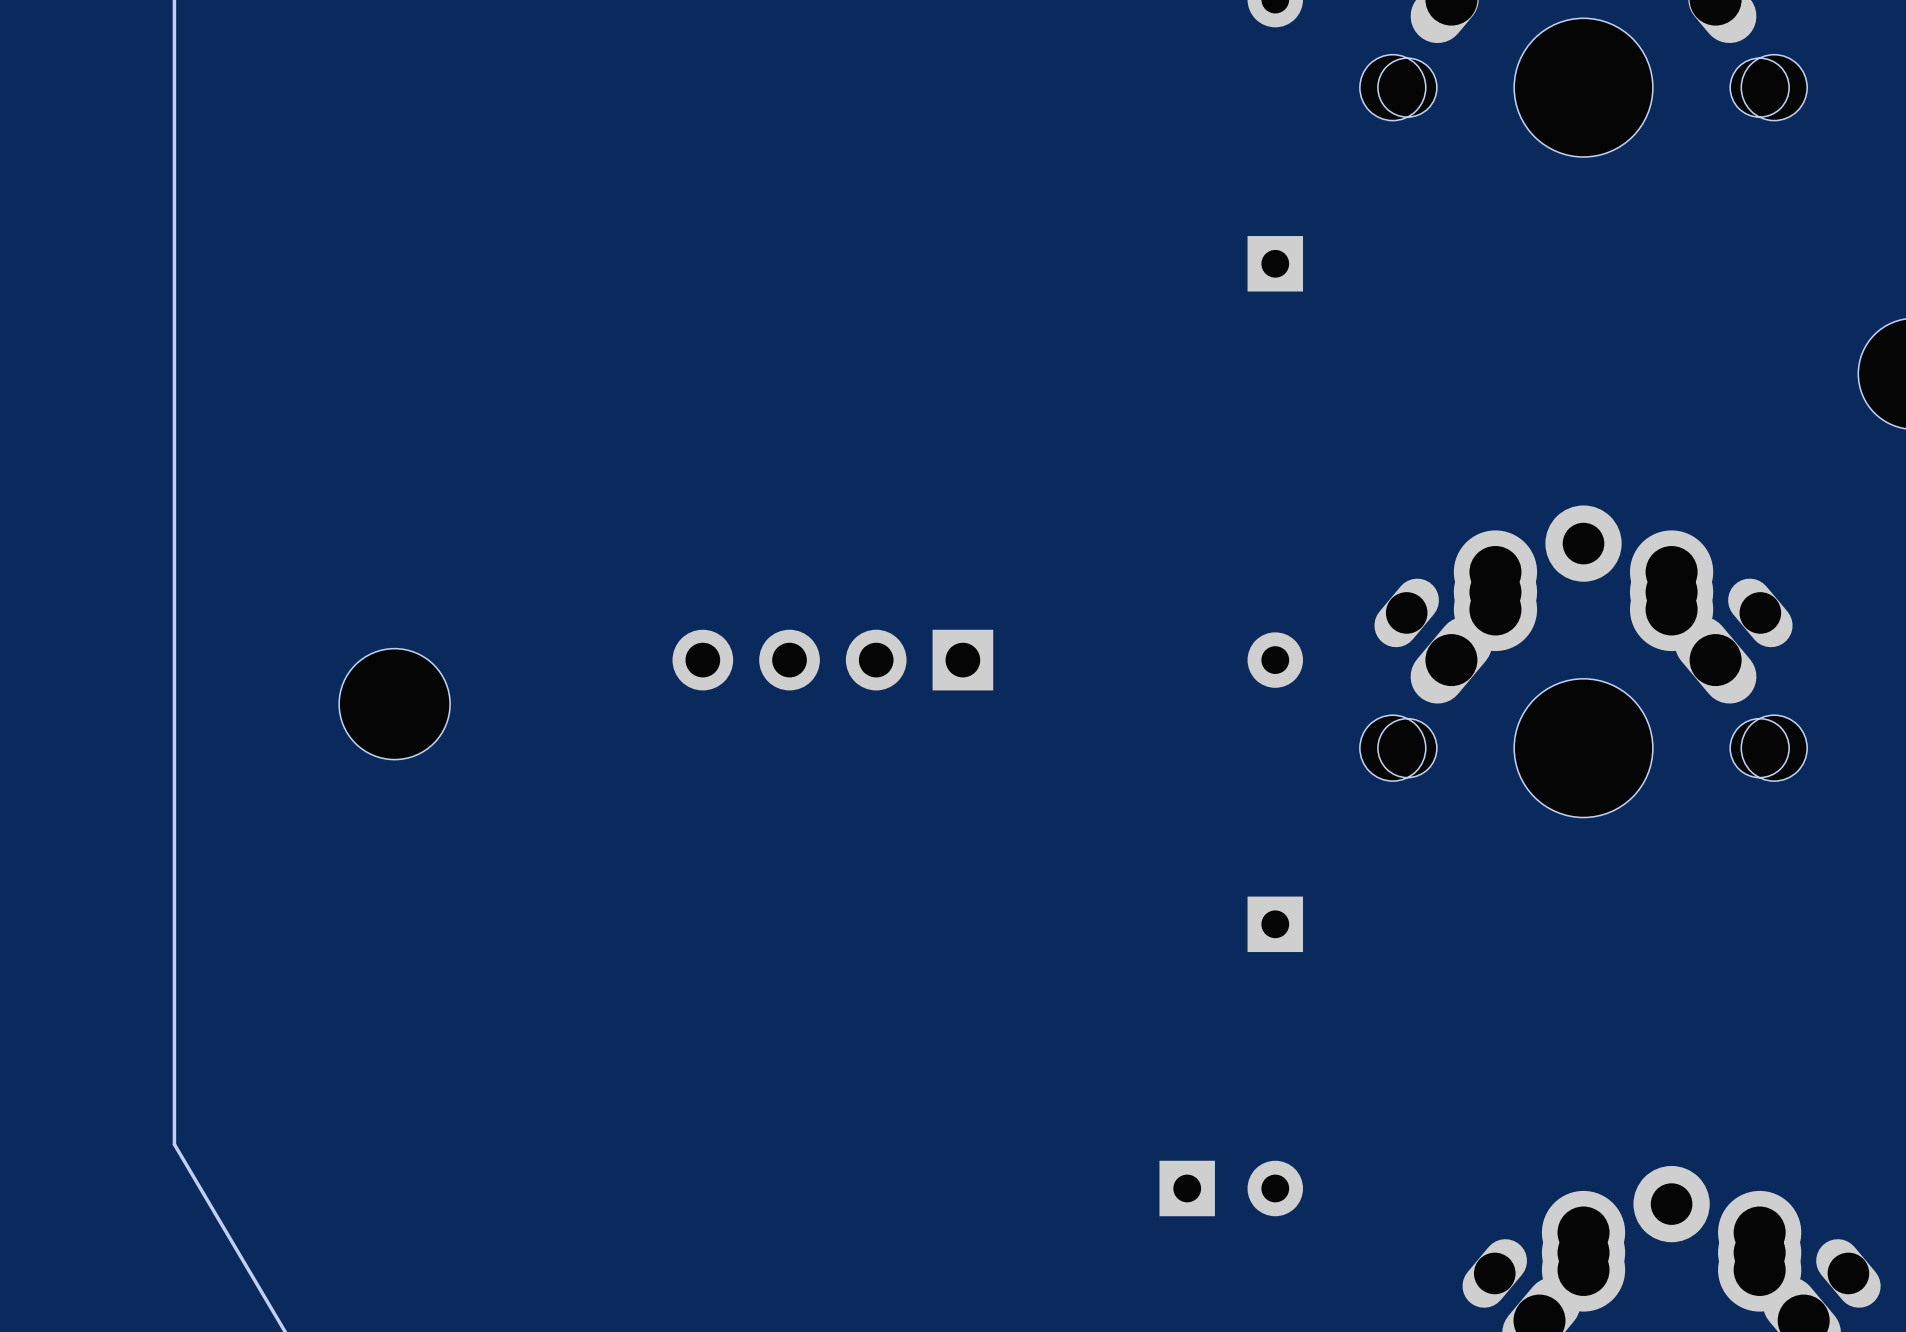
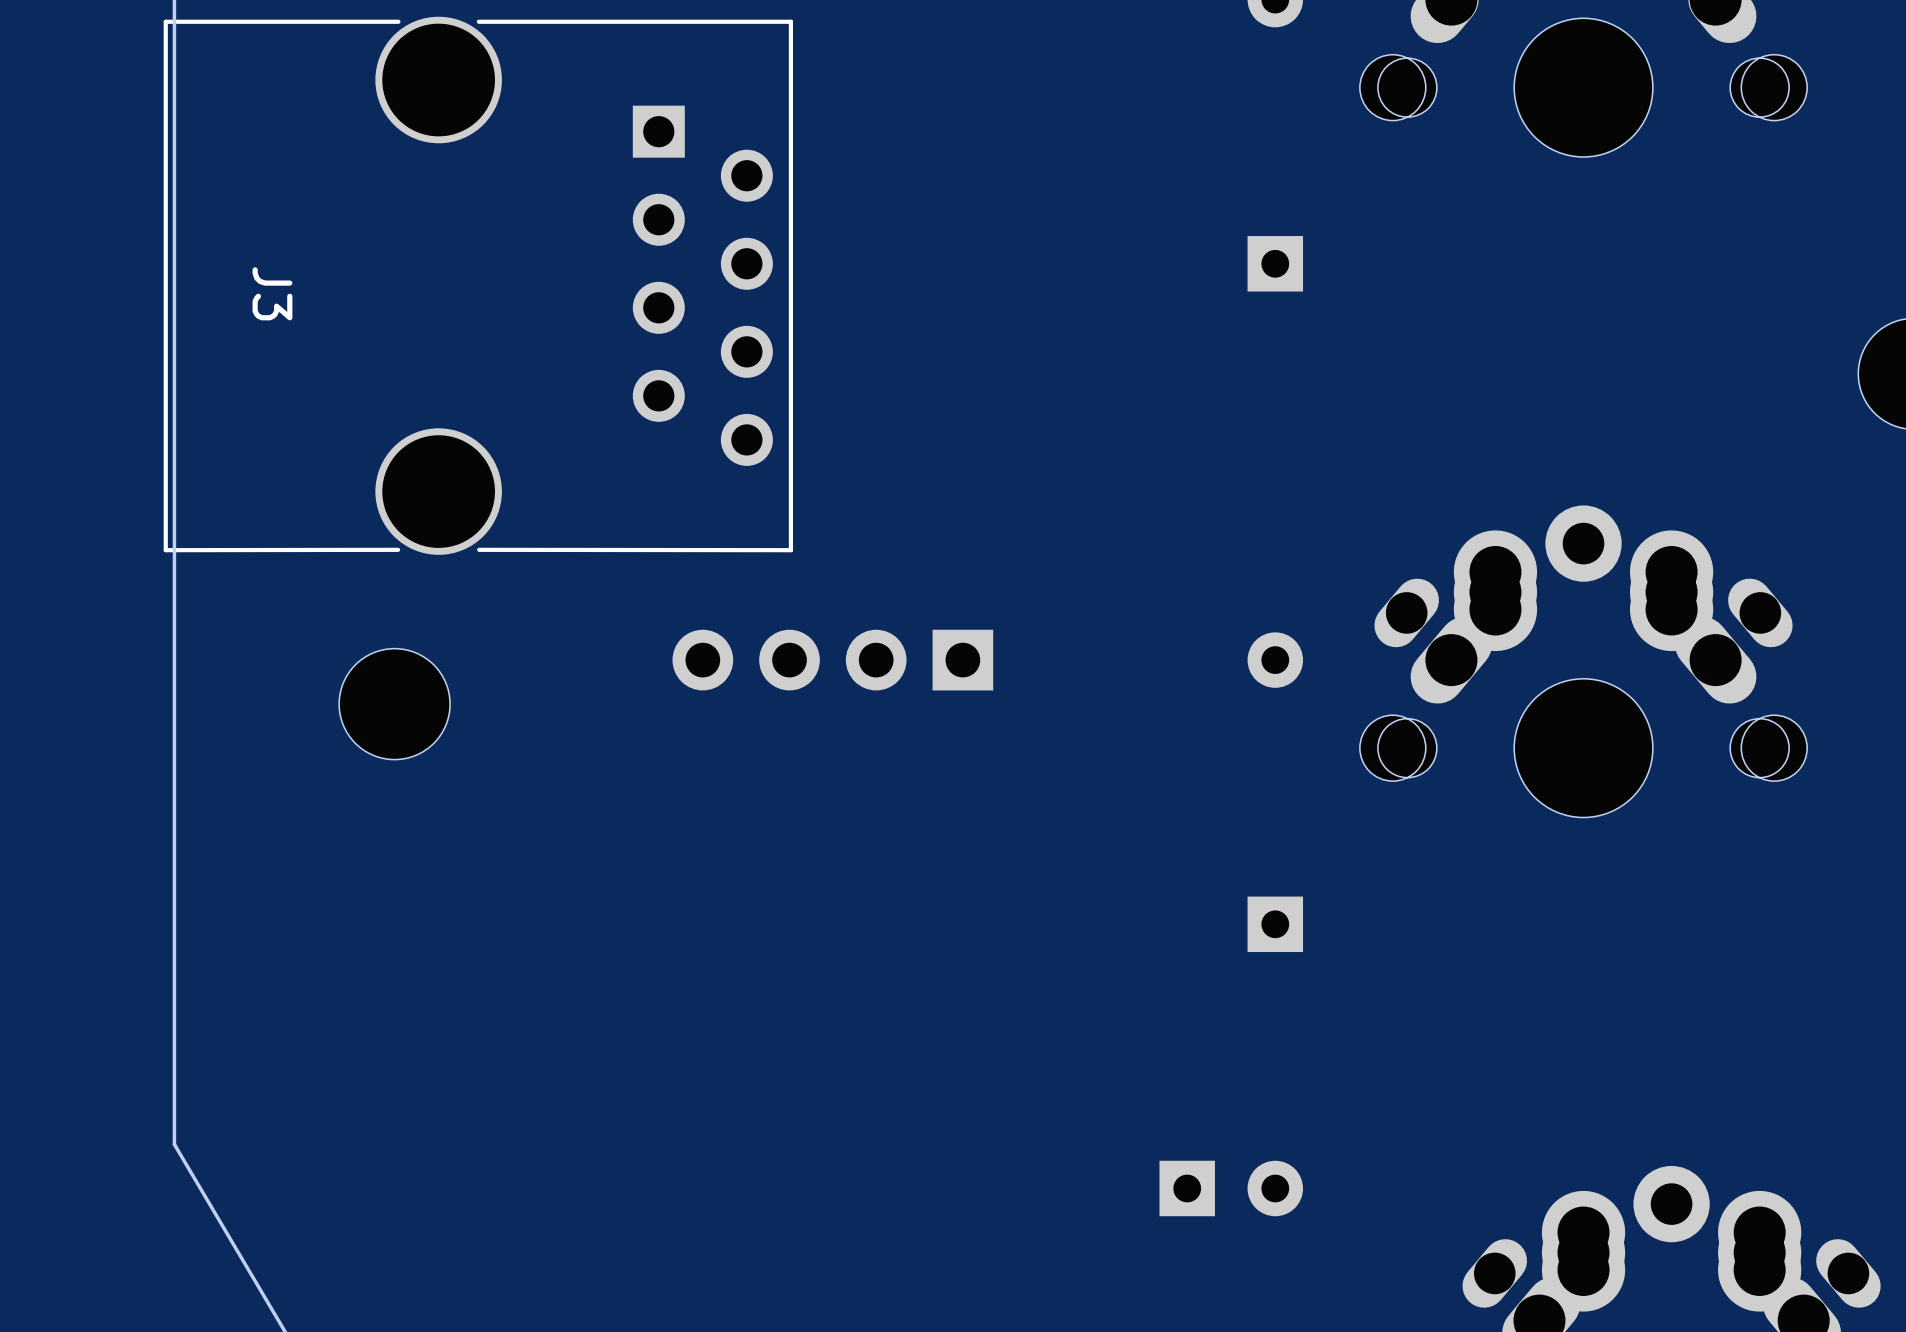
J3: none -> (478, 285)

